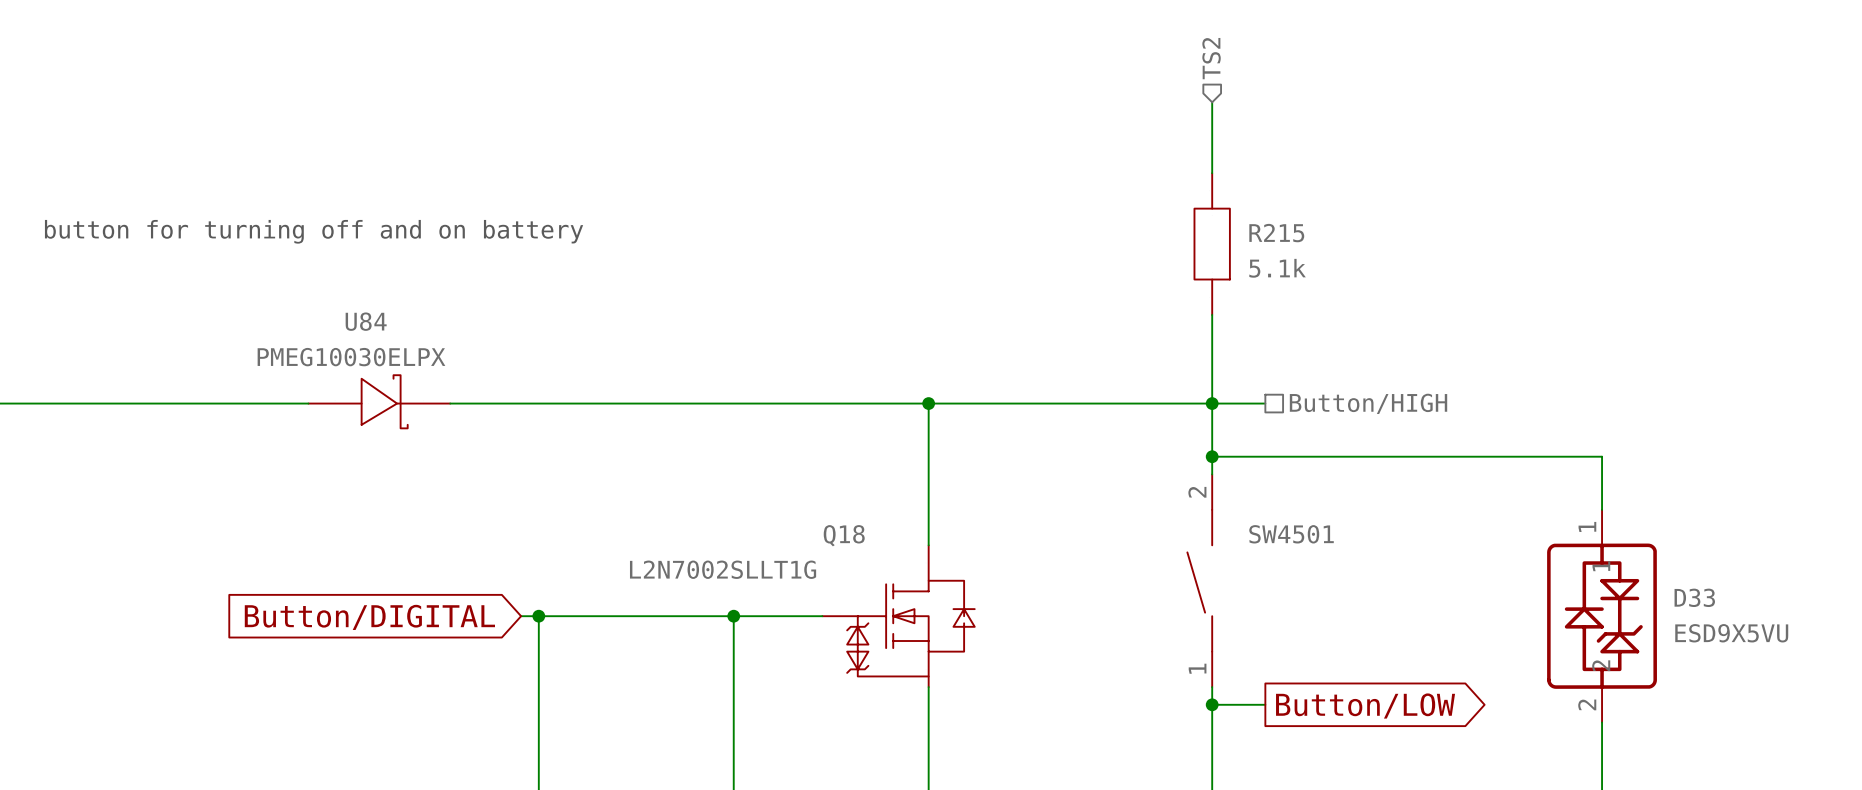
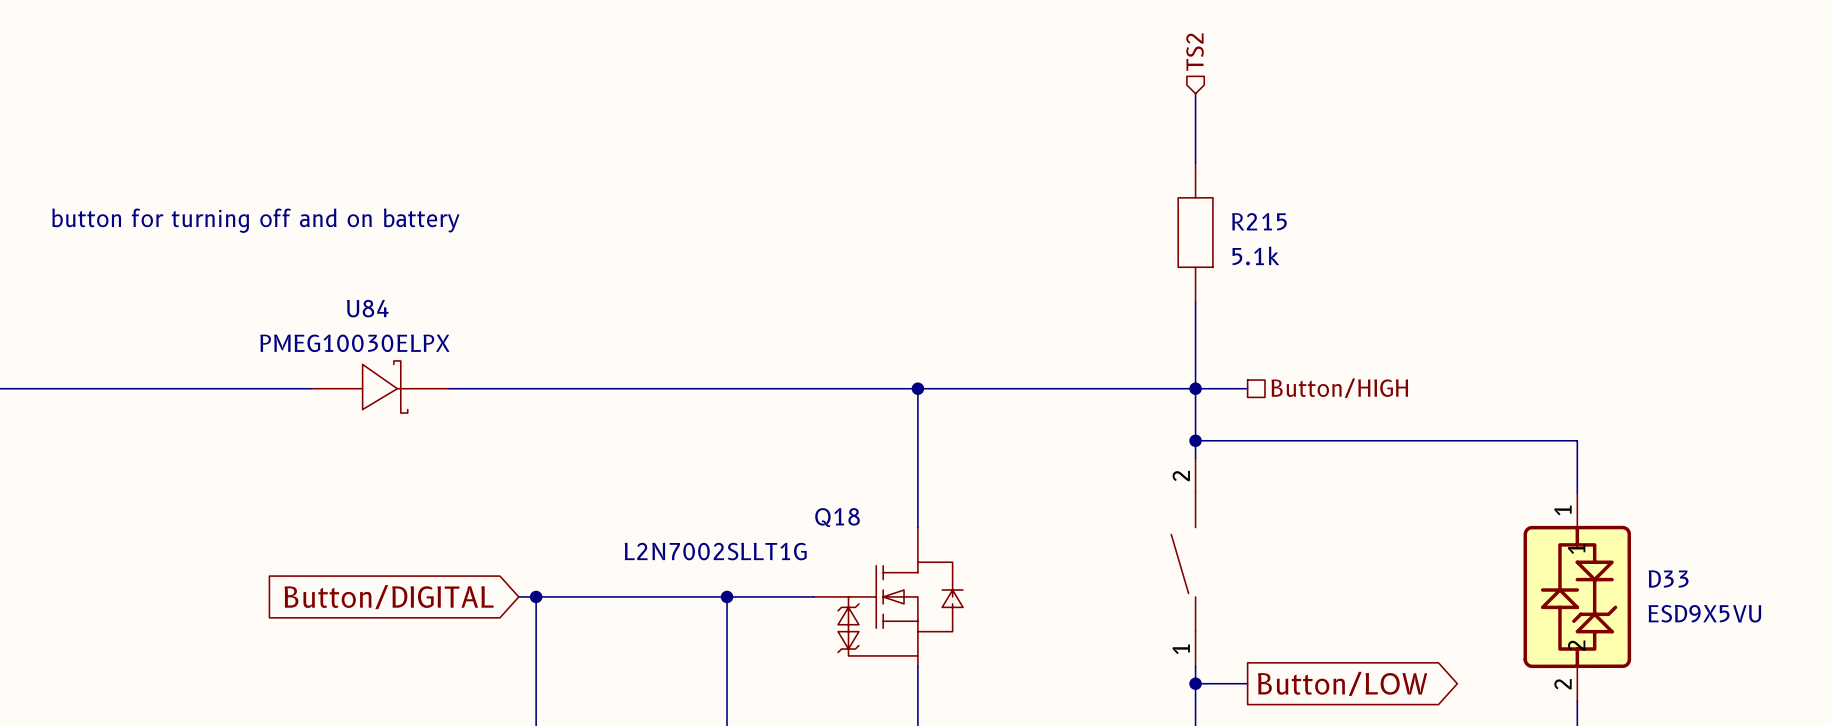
SW4501 name: SW4501 (1291, 534) -> none

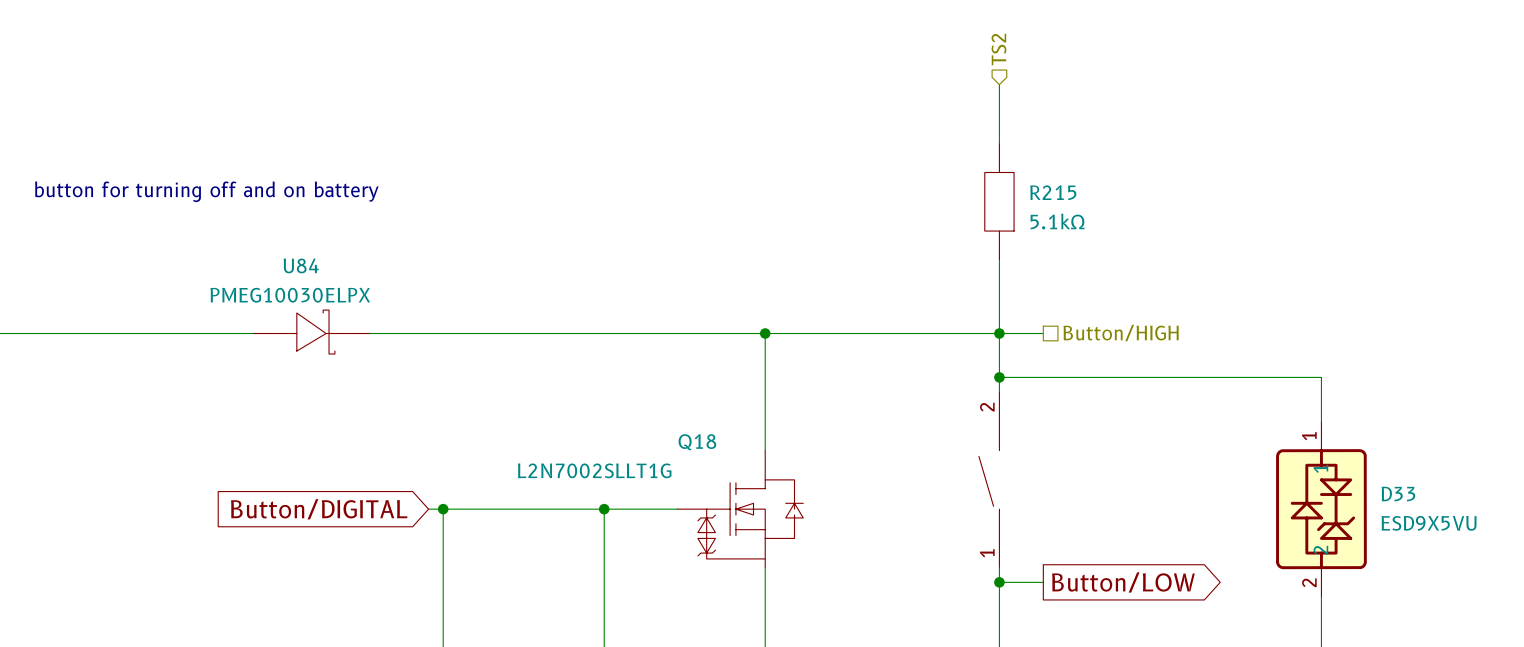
R215 value: 5.1k (1255, 255) -> 5.1kΩ (1057, 221)

